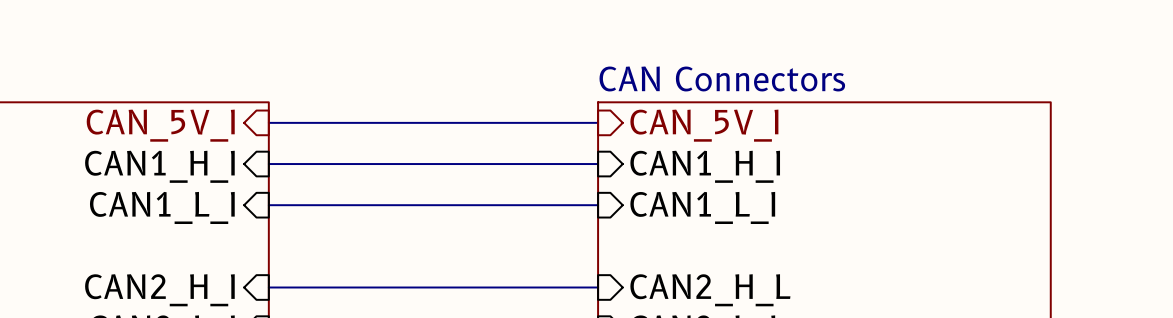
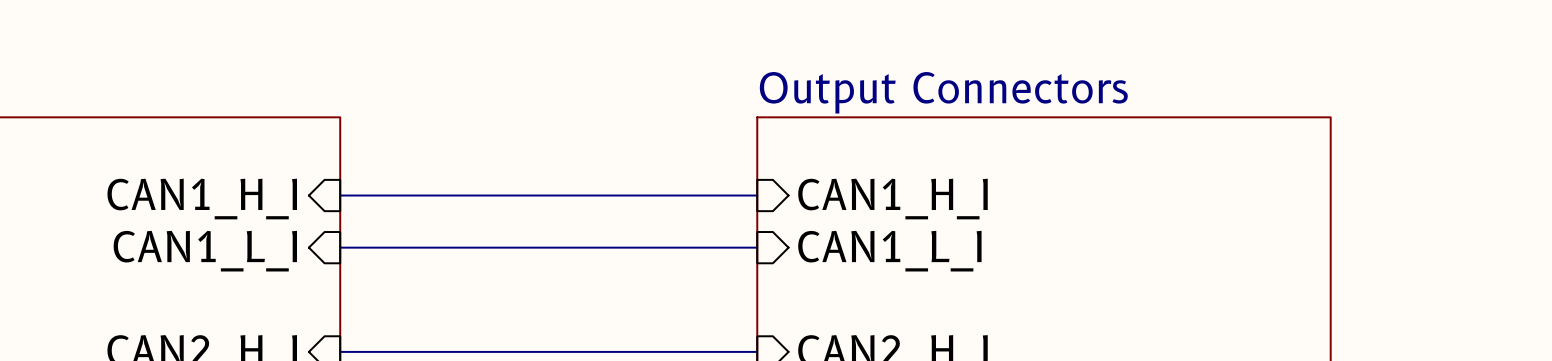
sheet CAN Connectors name: CAN Connectors (722, 78) -> Output Connectors (943, 92)
wire: (268, 122) (598, 122) -> none
hierarchical label: CAN_5V_I (160, 125) -> none
hierarchical label: CAN_5V_I (704, 125) -> none

